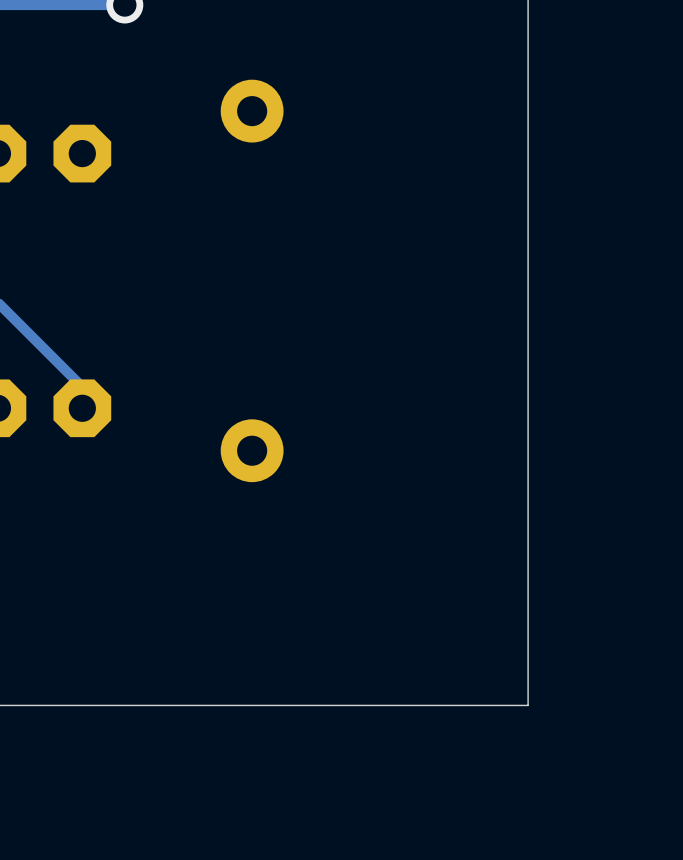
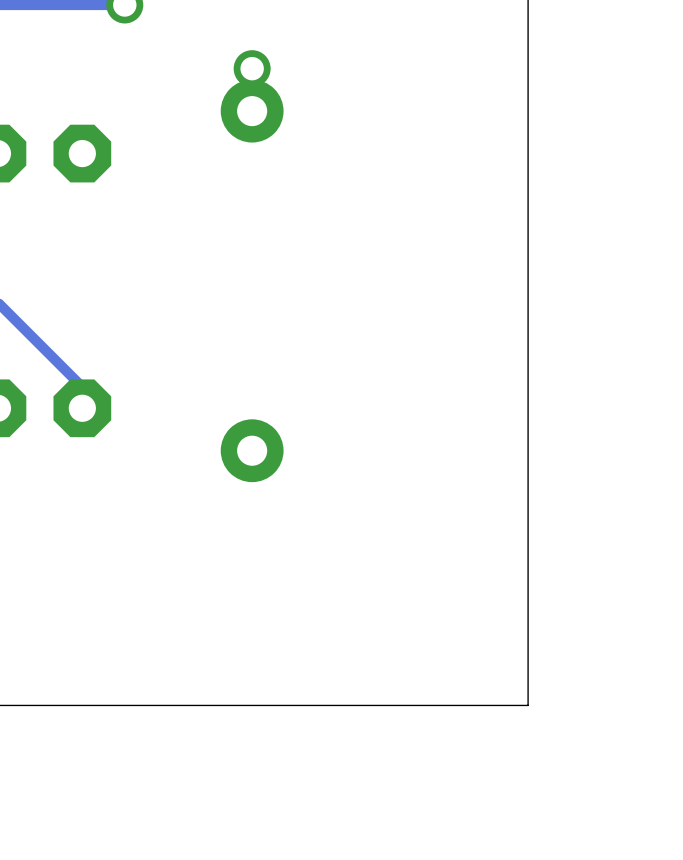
via: none -> (252, 68)

